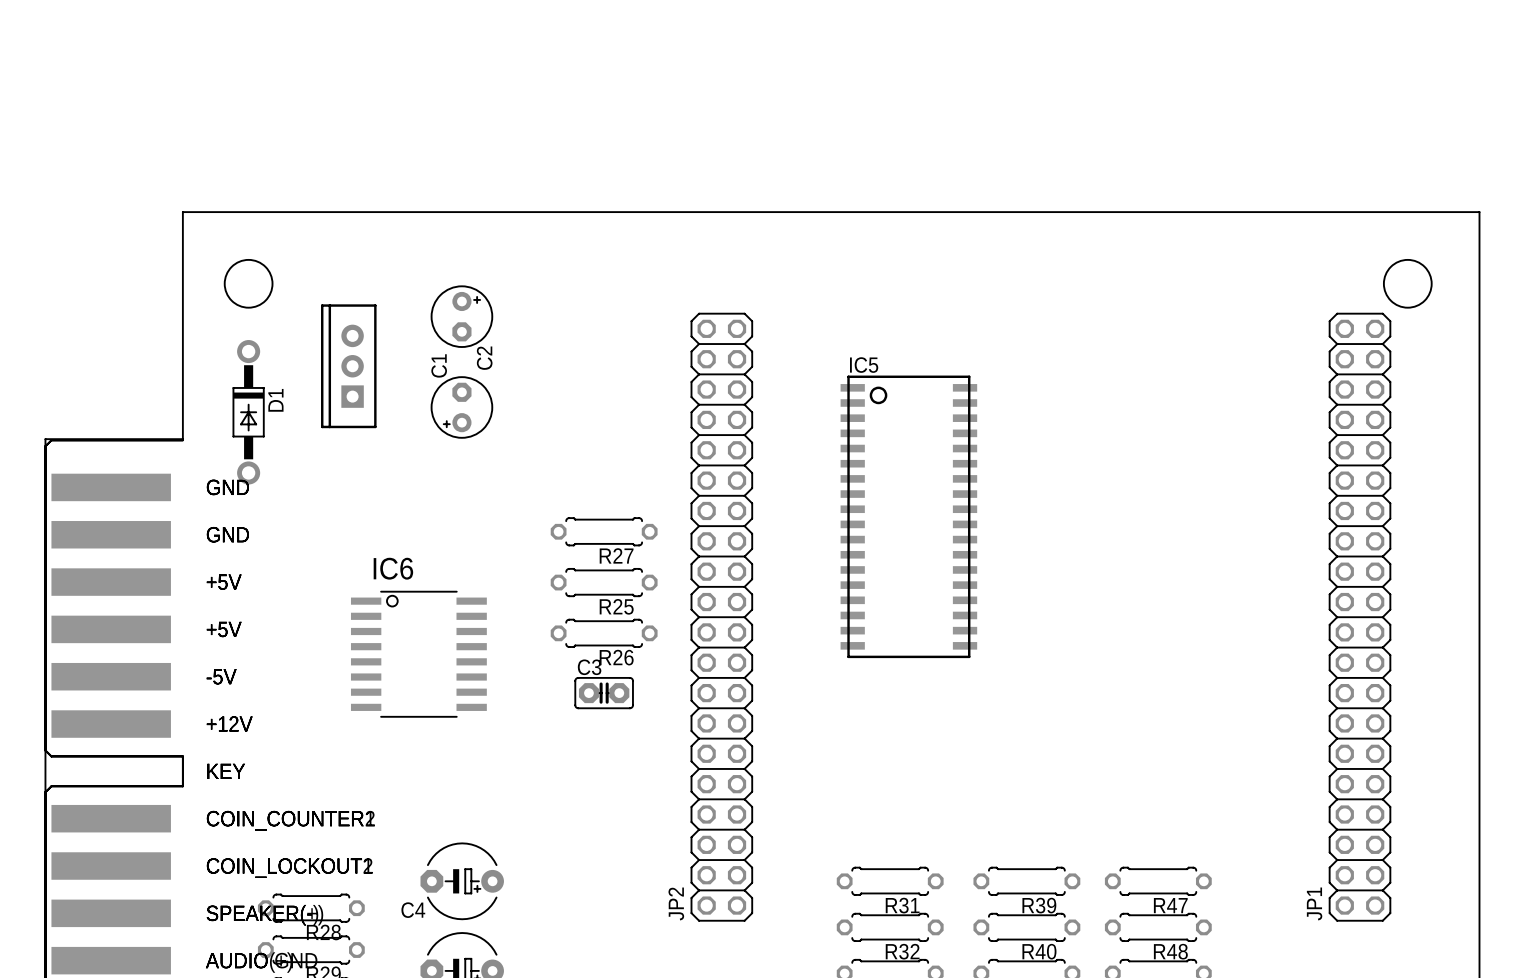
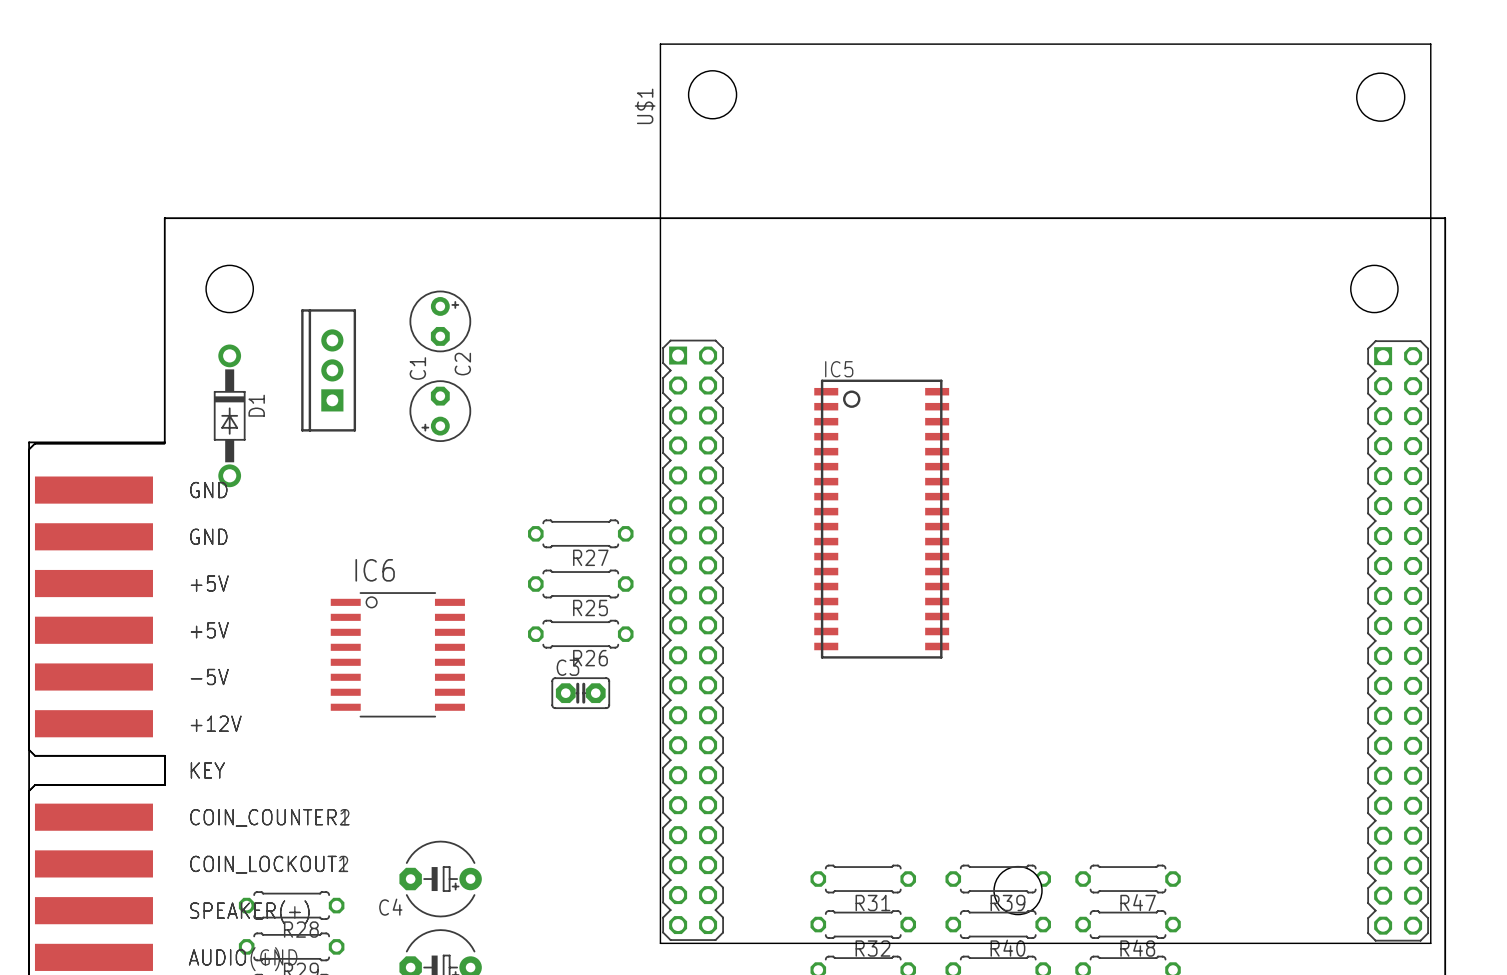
U$1: none -> (1045, 493)
JP2: (721, 617) -> none
JP1: (1359, 617) -> none

